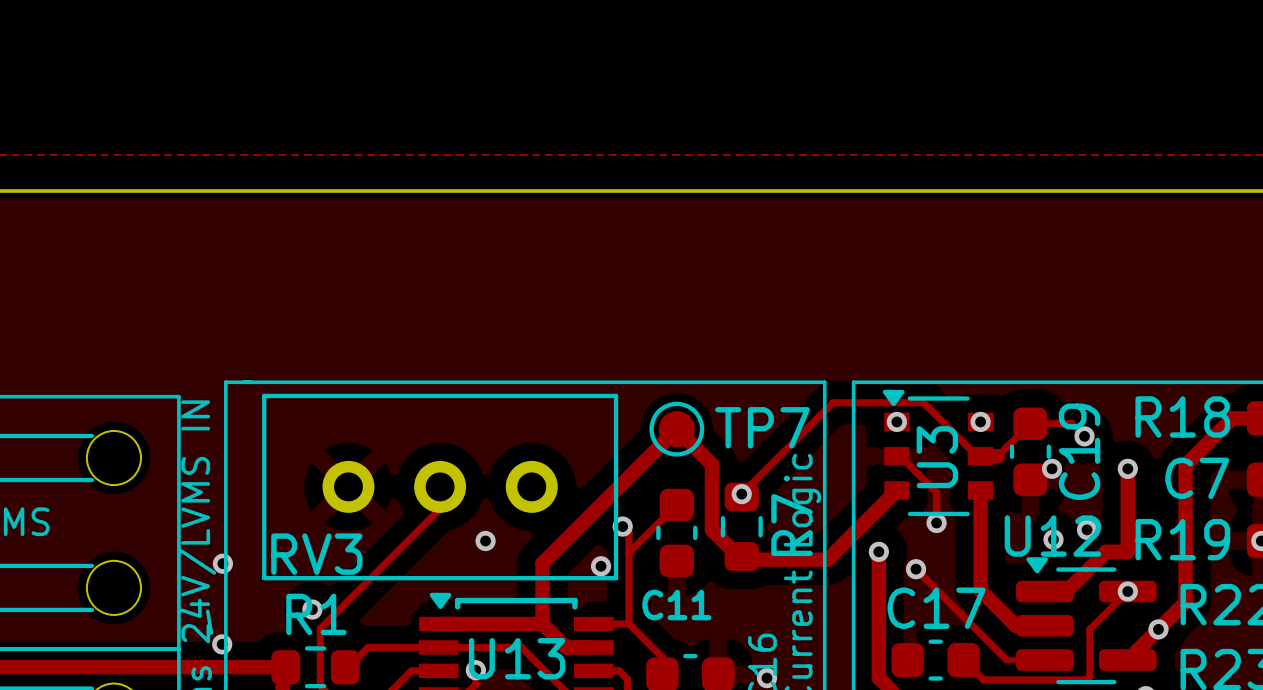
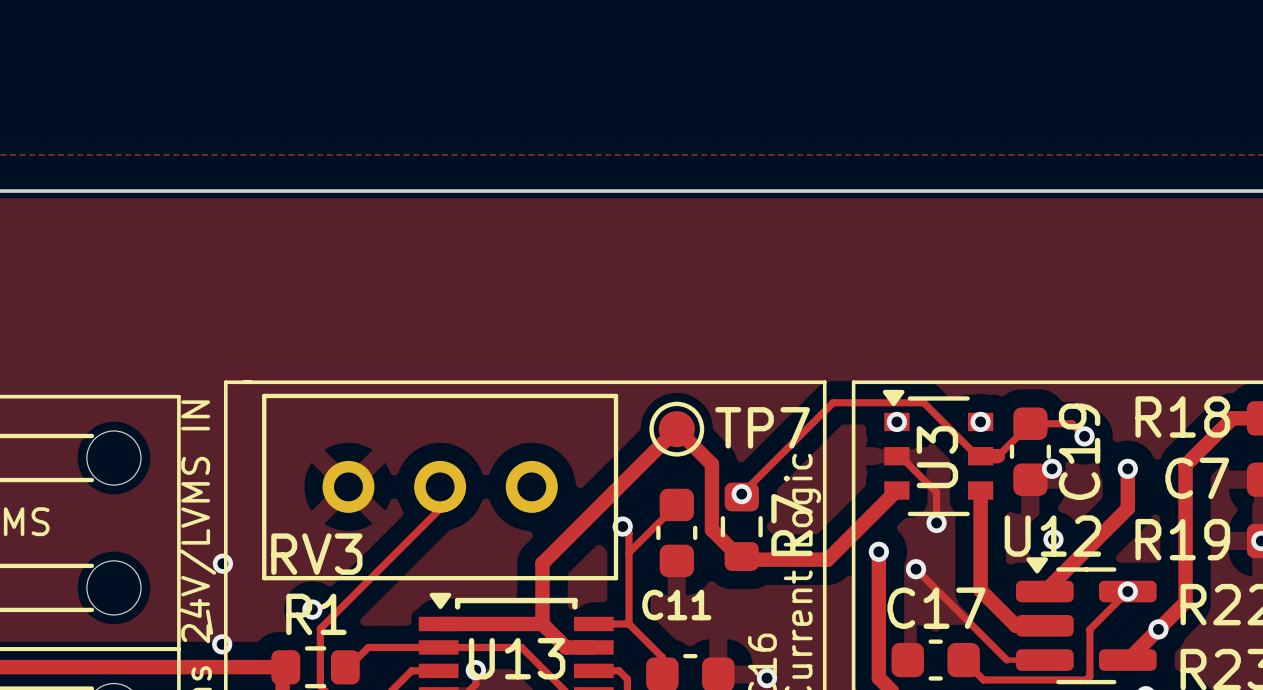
track: (1127, 508) (1127, 551) (1106, 551) (1066, 591) (1044, 591) -> (1127, 508) (1044, 591)
via: (1087, 529) -> none
via: (485, 541) -> none
via: (601, 566) -> none

